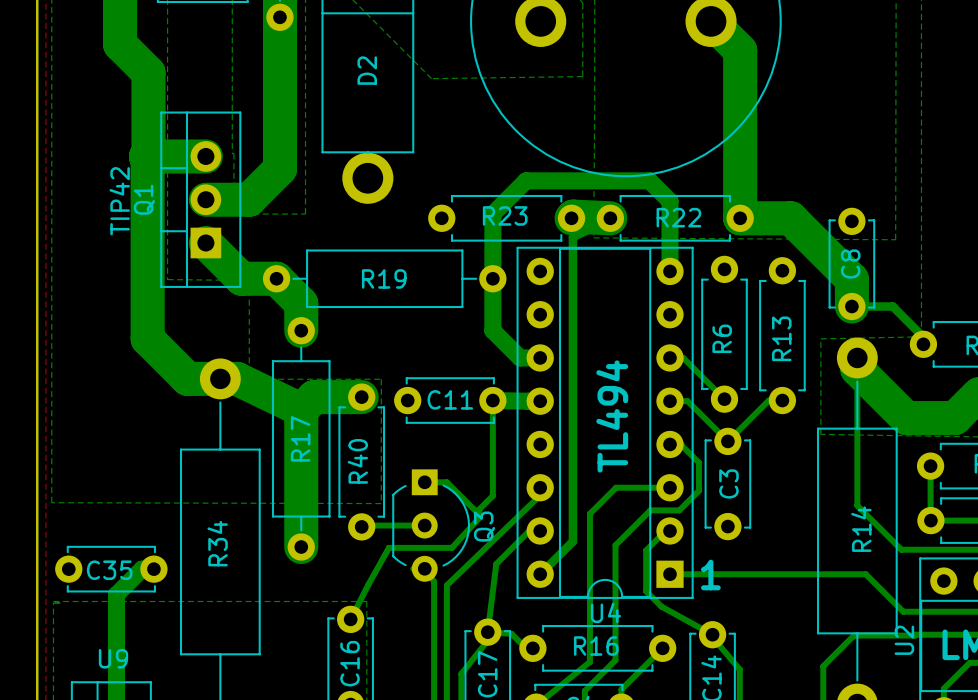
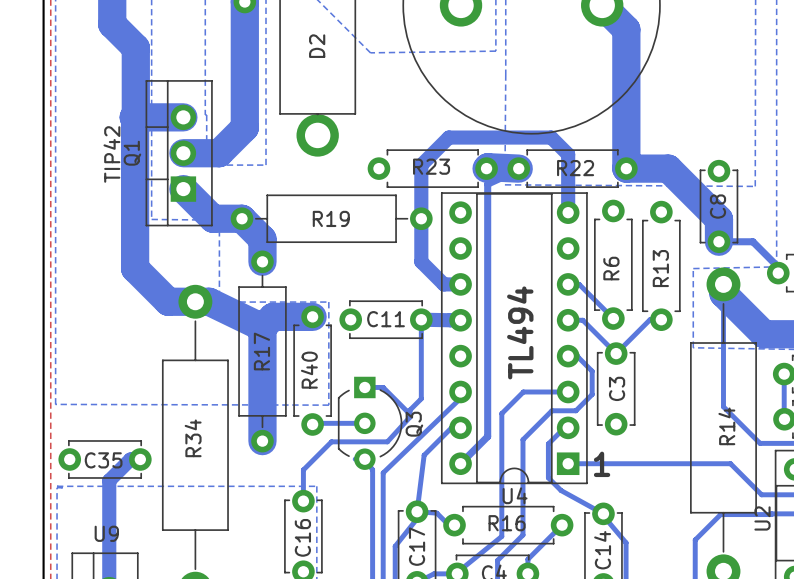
bottom track: (388, 547) (350, 619) -> (335, 441) (331, 441) (303, 469) (303, 501)

